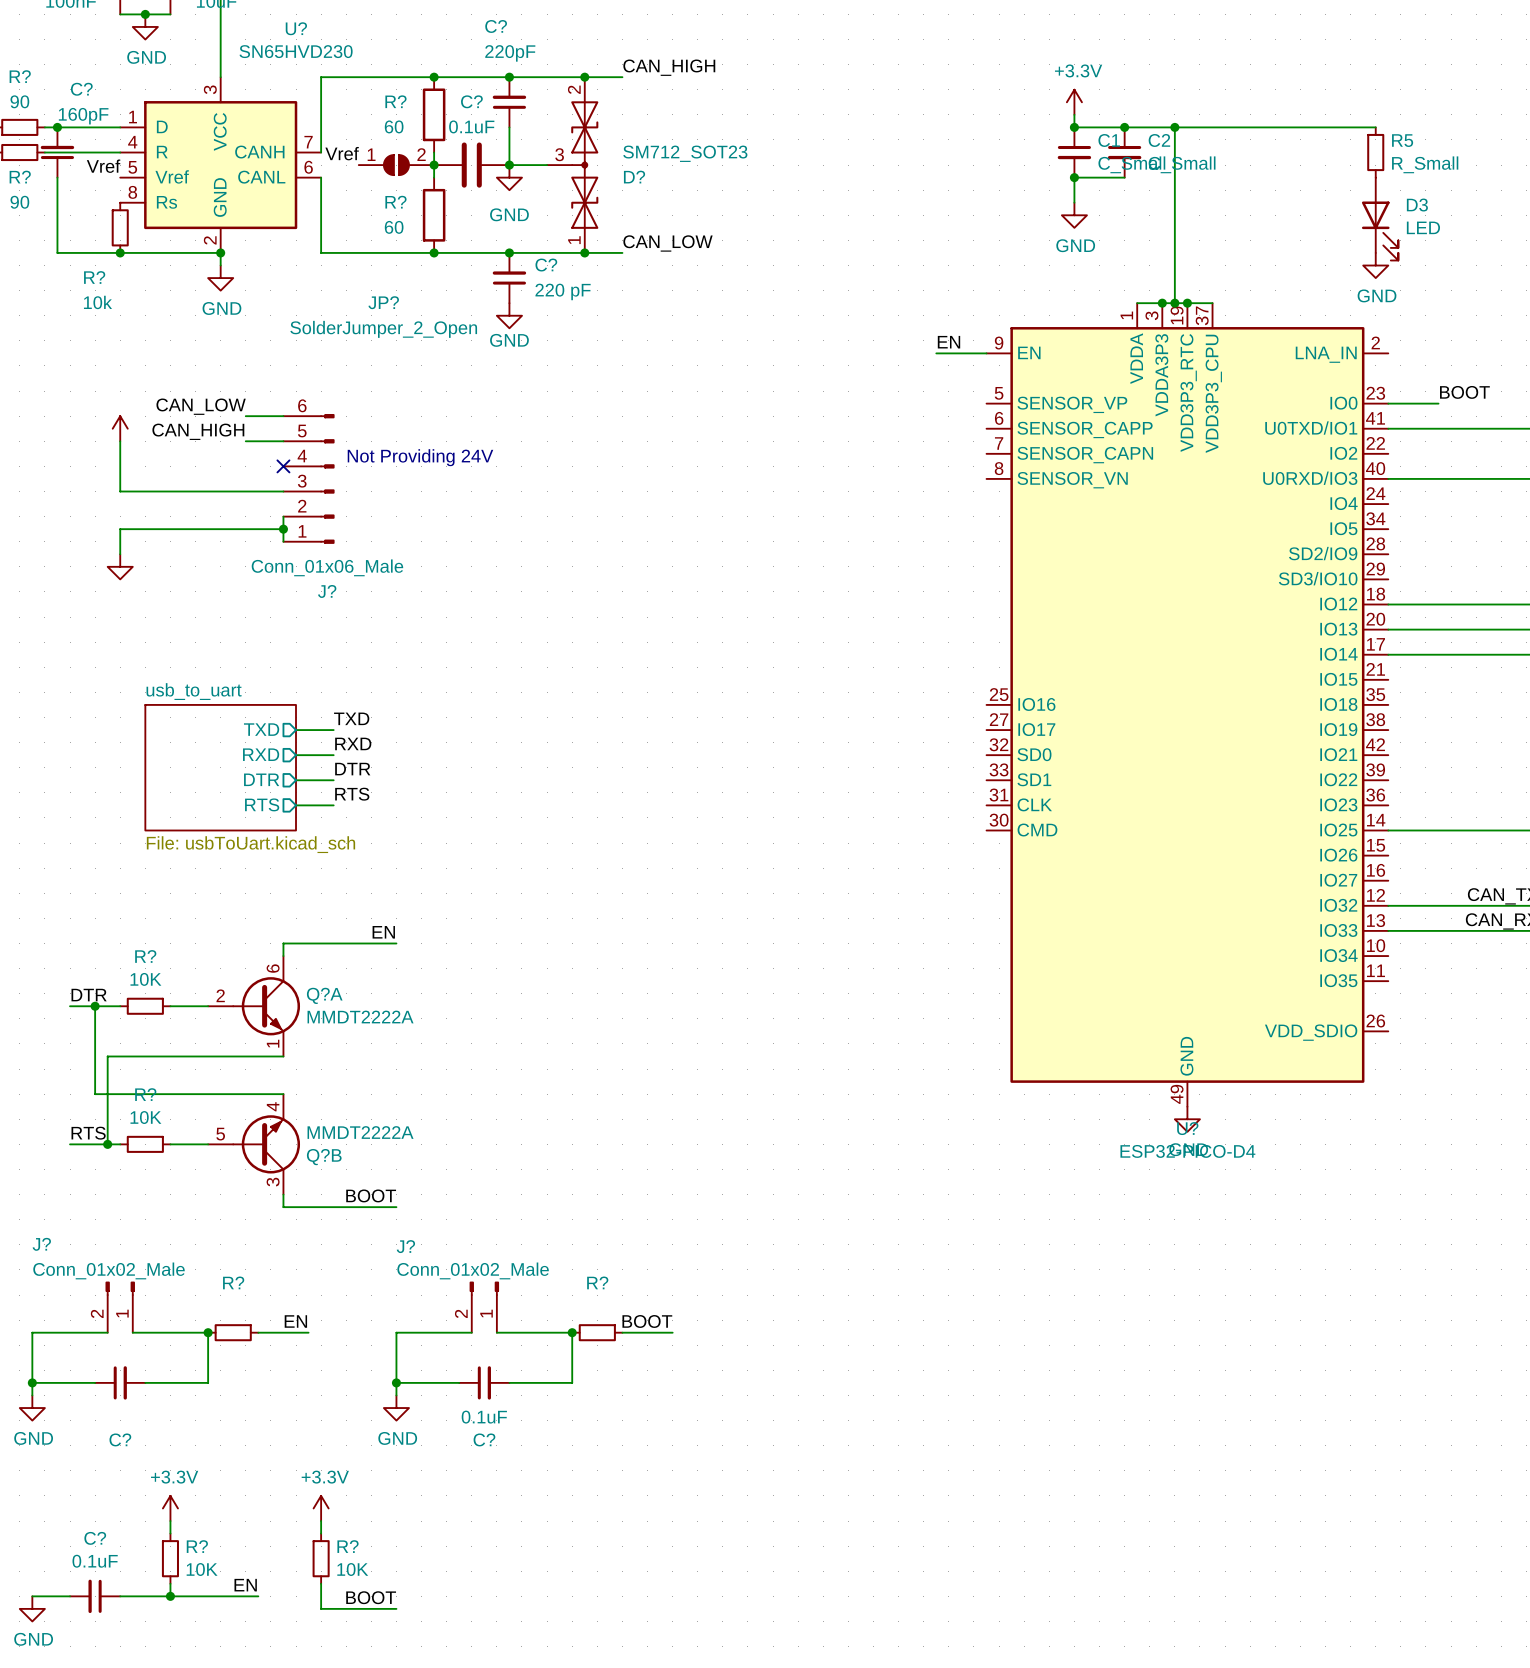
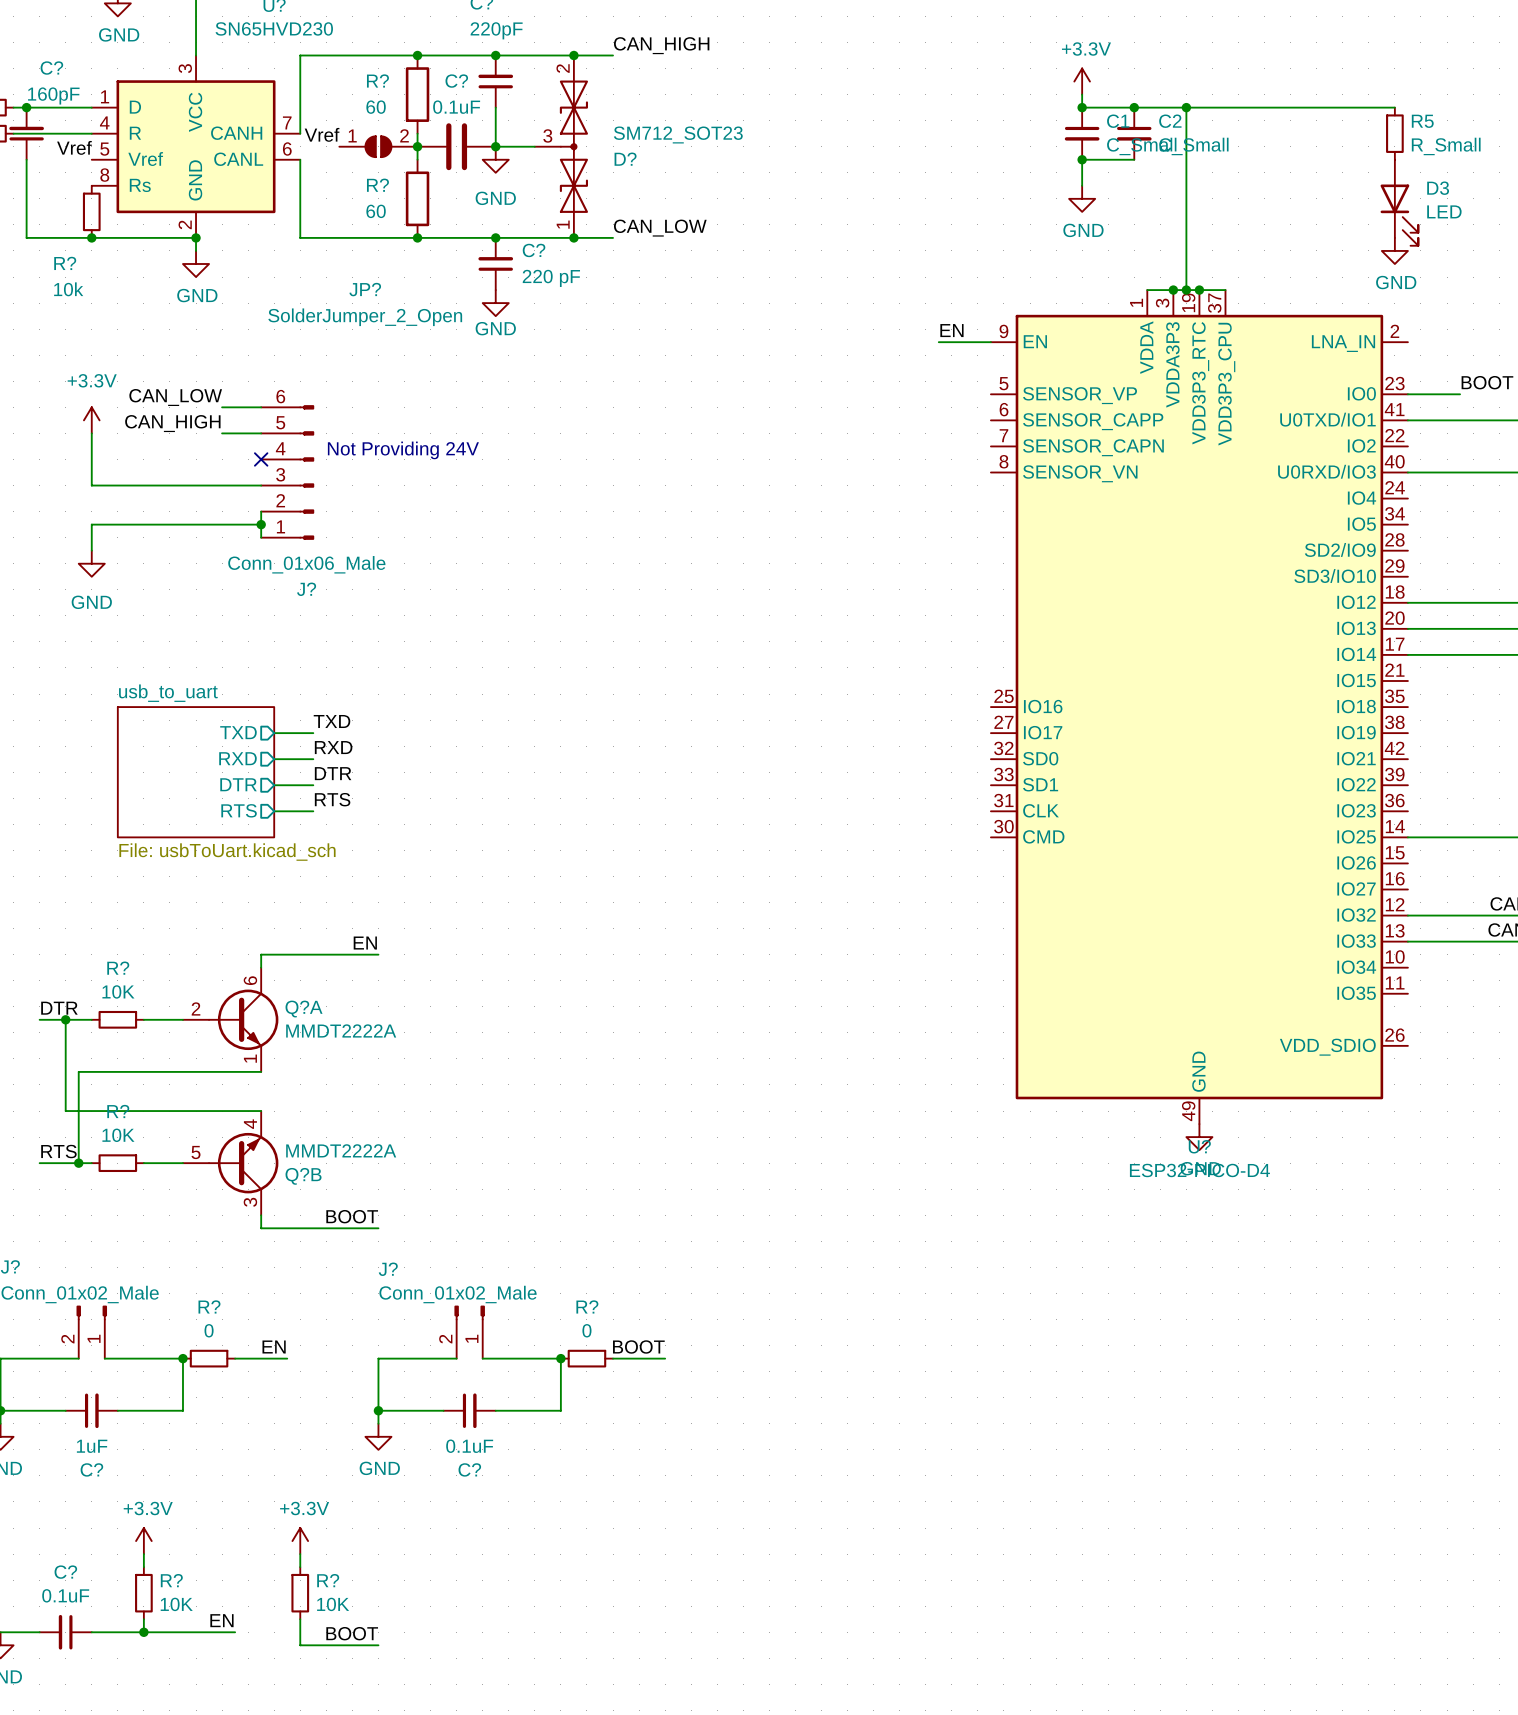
power symbol text: none -> +3.3V (92, 380)
power symbol text: none -> GND (91, 602)
R? value: none -> 0 (209, 1330)
R? value: none -> 0 (586, 1330)
C? value: none -> 1uF (92, 1446)

